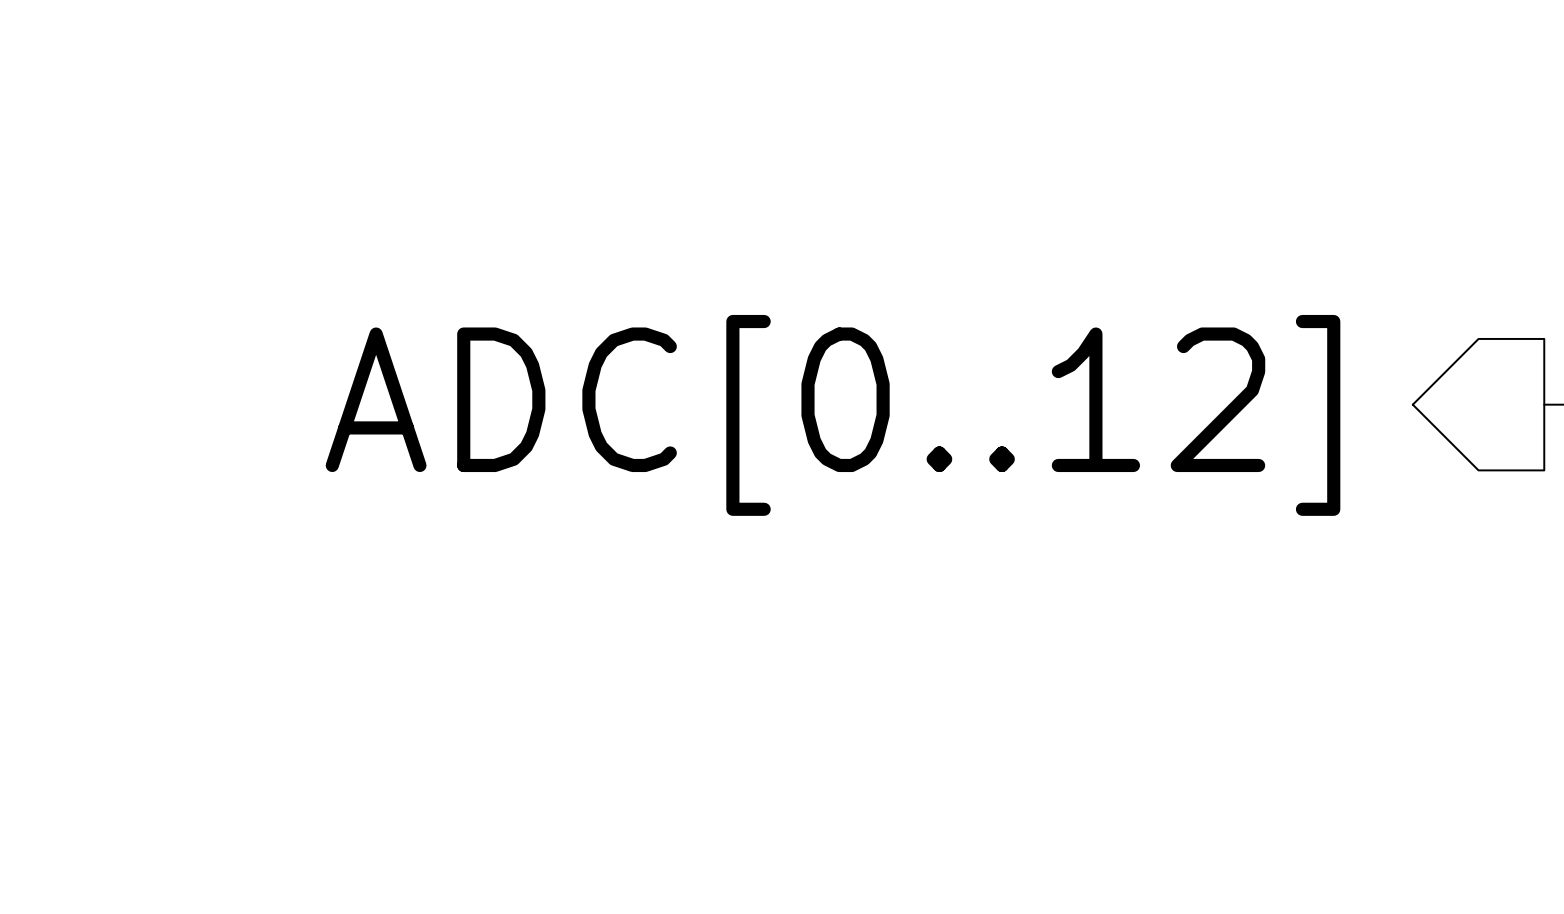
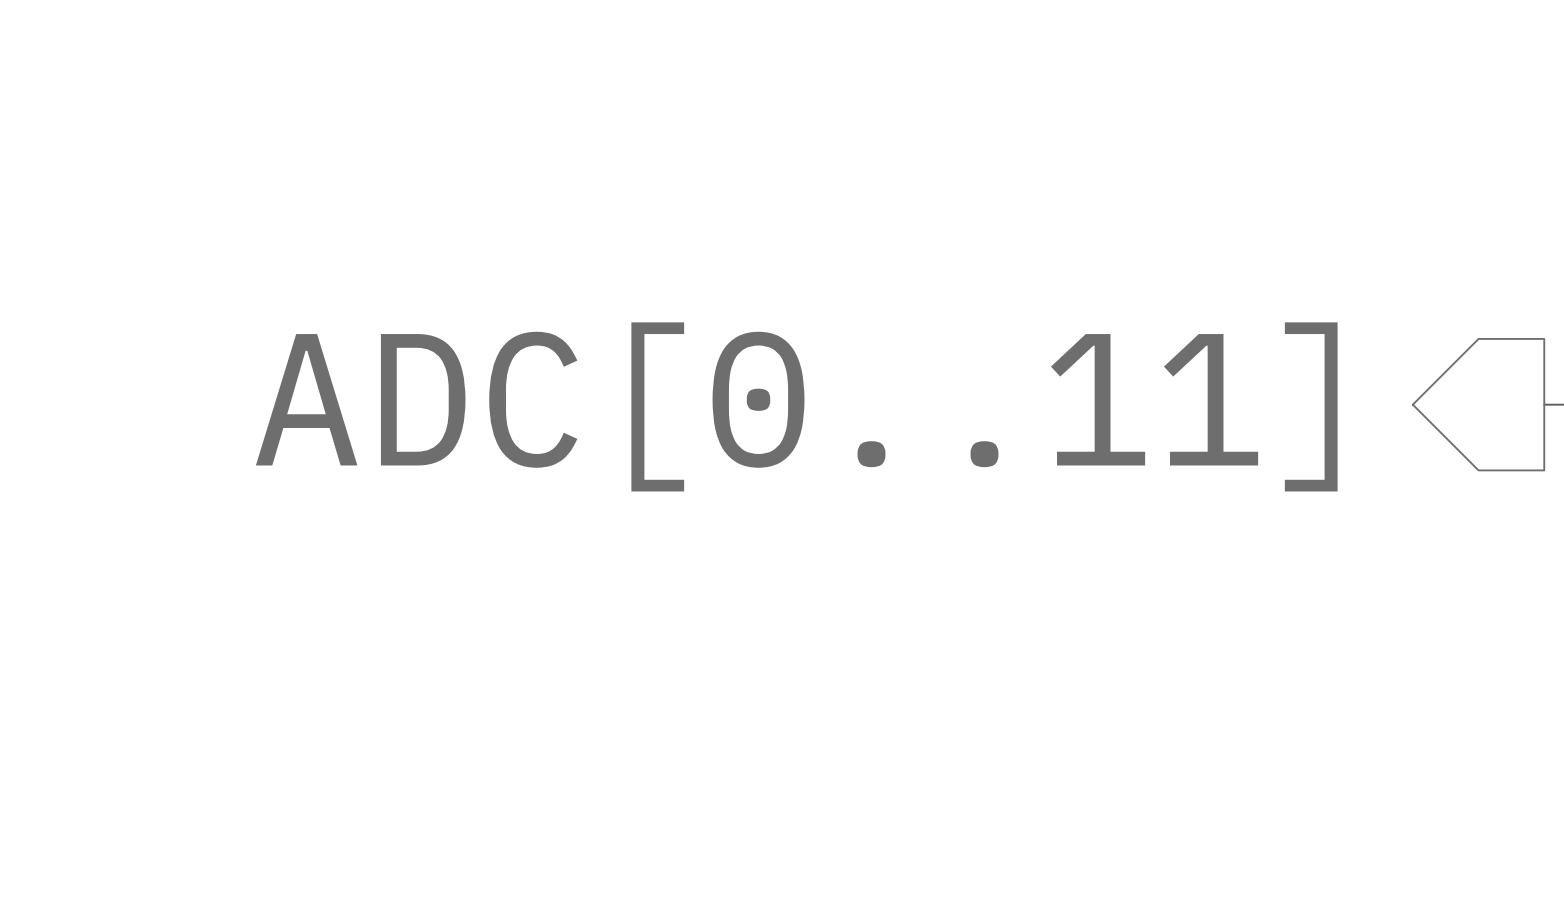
hierarchical label: ADC[0..12] (833, 415) -> ADC[0..11] (796, 406)

